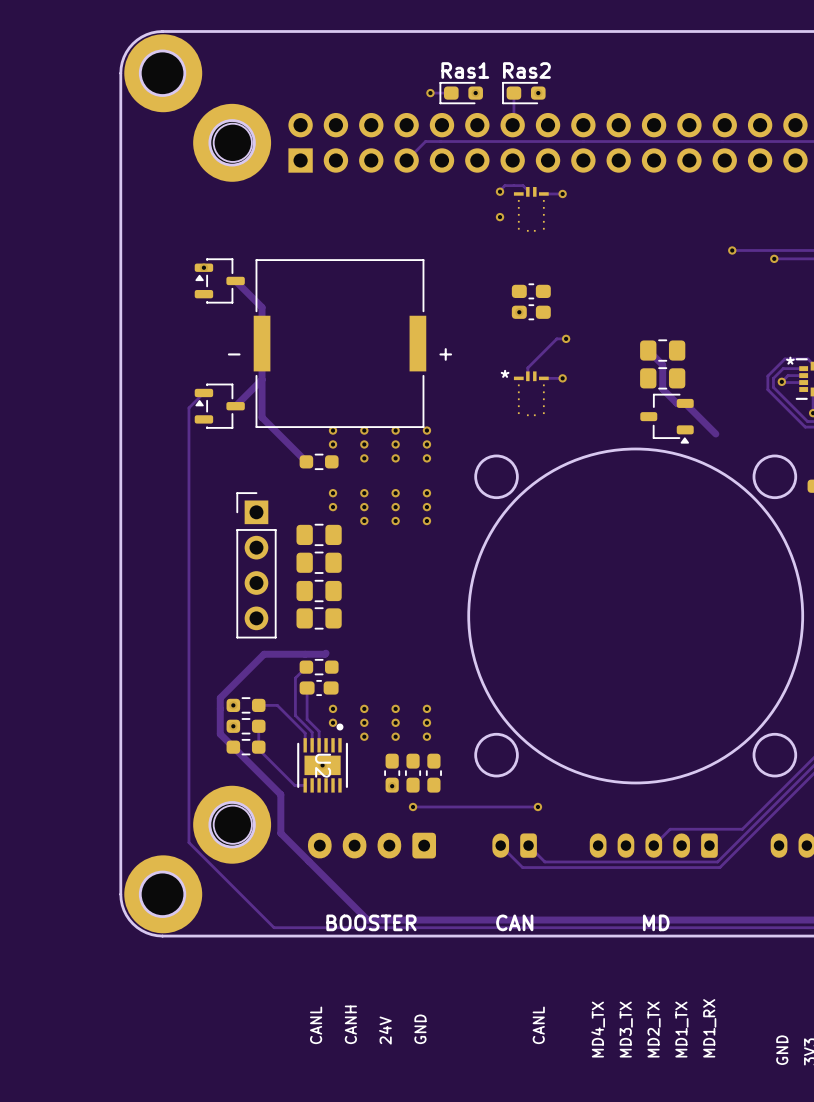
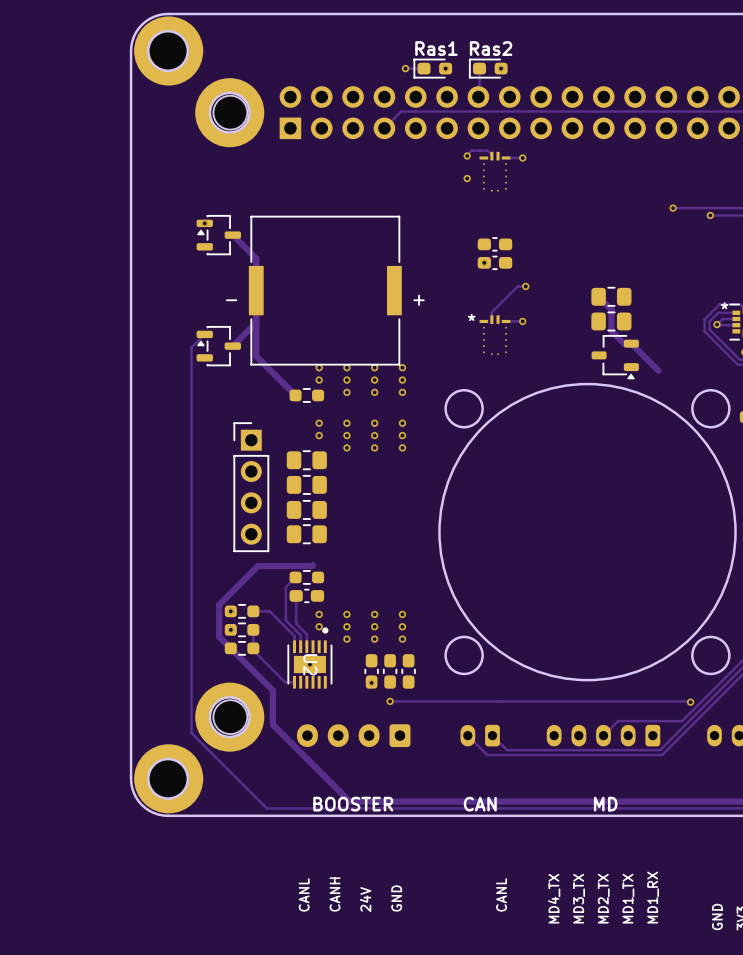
track: none -> (500, 701) (690, 702)
via: (537, 806) -> none
via: none -> (690, 702)

